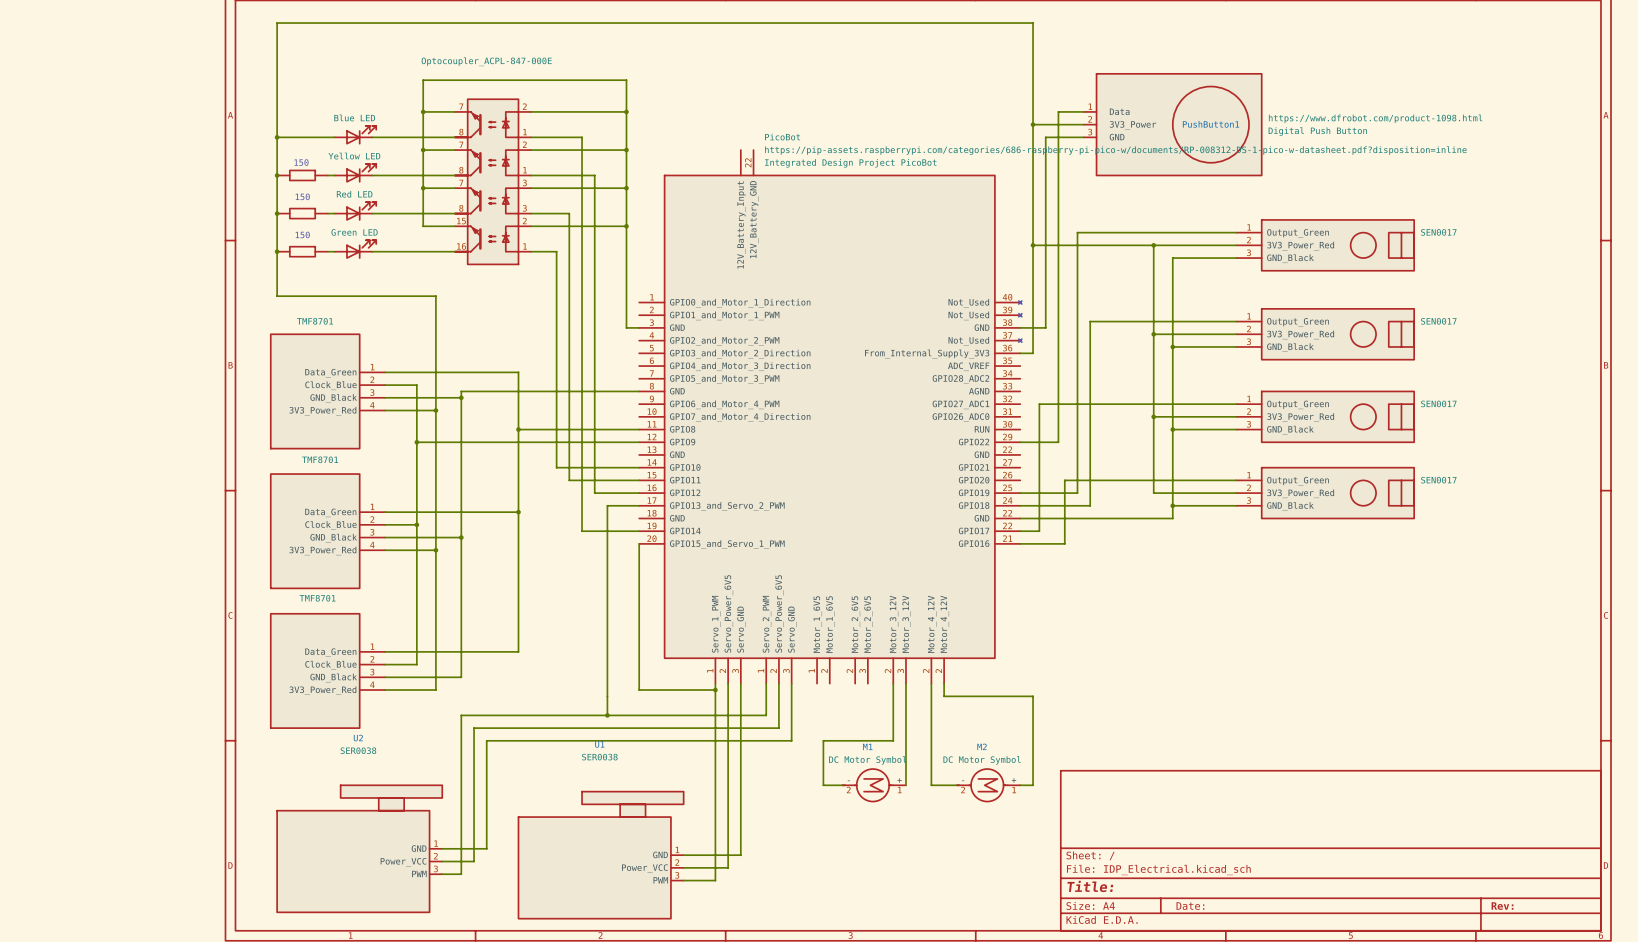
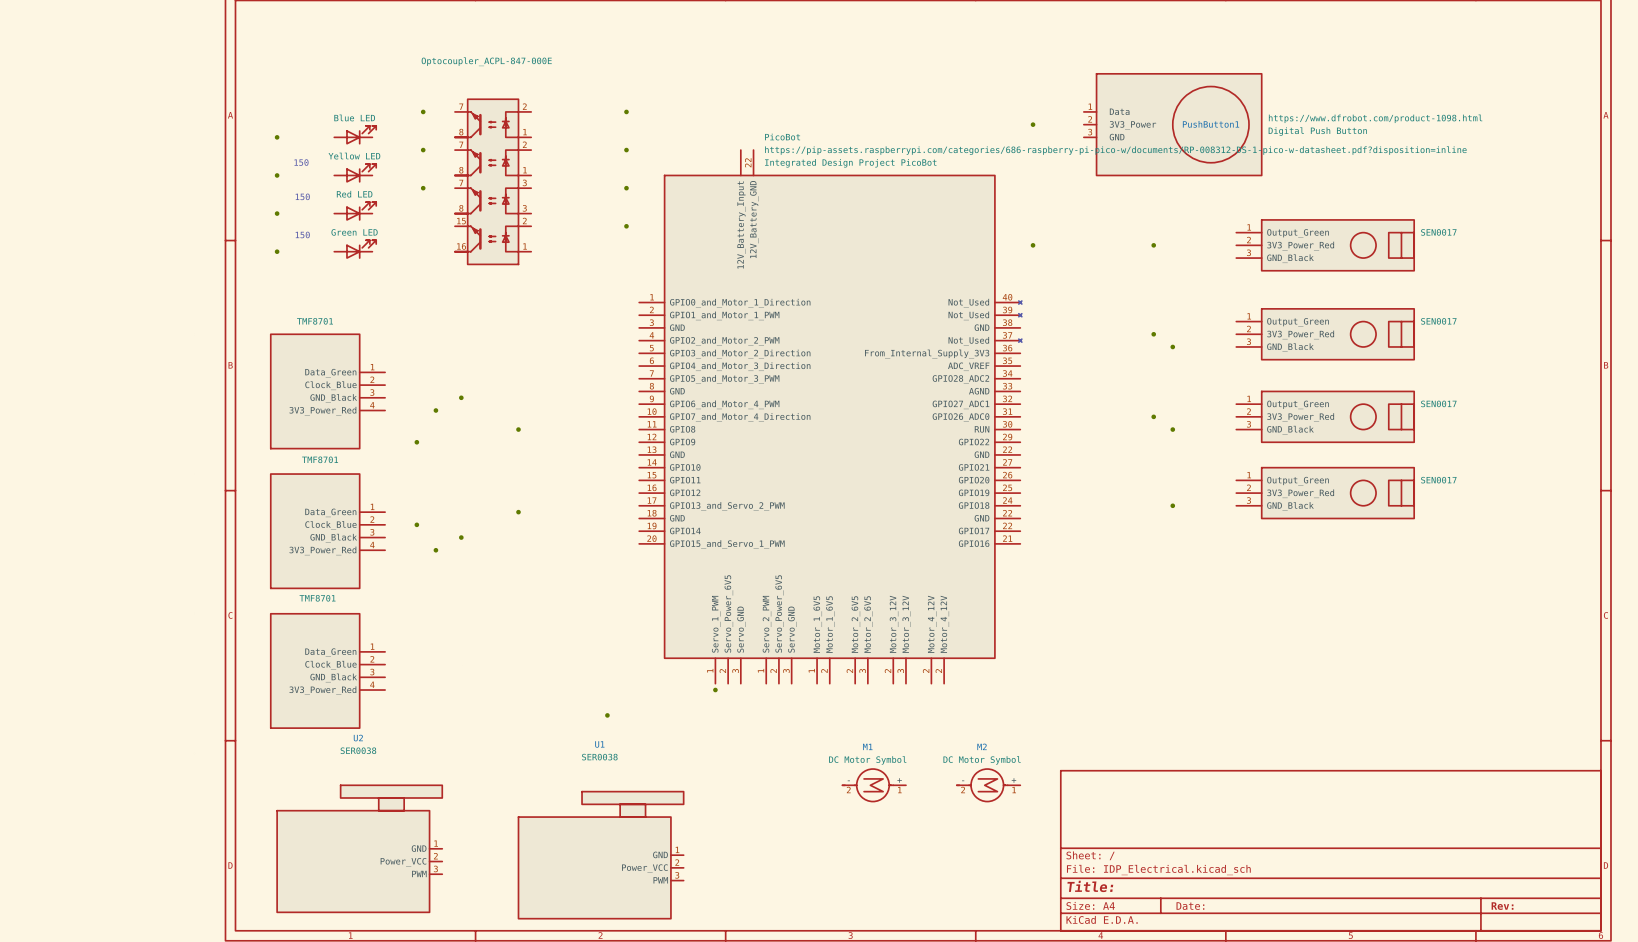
wire: (423, 111) (454, 111) -> none
wire: (531, 111) (626, 111) -> none
wire: (1083, 111) (1058, 111) (1058, 442) (1020, 442) -> none
wire: (1033, 124) (1083, 124) -> none
wire: (277, 137) (334, 137) -> none
wire: (372, 137) (454, 137) -> none
wire: (531, 137) (582, 137) (582, 531) (639, 531) -> none
wire: (1083, 137) (1045, 137) (1045, 327) (1020, 327) -> none
wire: (423, 150) (454, 150) -> none
wire: (531, 150) (626, 150) -> none
part: (302, 175) -> none
wire: (327, 175) (334, 175) -> none
wire: (372, 175) (454, 175) -> none
wire: (531, 175) (594, 175) (594, 493) (639, 493) -> none
wire: (423, 188) (454, 188) -> none
wire: (531, 188) (626, 188) -> none
part: (302, 213) -> none
wire: (327, 213) (334, 213) -> none
wire: (372, 213) (454, 213) -> none
wire: (531, 213) (569, 213) (569, 480) (639, 480) -> none
wire: (454, 226) (423, 226) (423, 80) (626, 80) (626, 327) (639, 327) -> none
wire: (531, 226) (626, 226) -> none
wire: (1236, 232) (1077, 232) (1077, 493) (1020, 493) -> none
wire: (1033, 245) (1236, 245) -> none
wire: (1153, 245) (1153, 493) (1236, 493) -> none
part: (302, 251) -> none
wire: (327, 251) (334, 251) -> none
wire: (372, 251) (454, 251) -> none
wire: (531, 251) (556, 251) (556, 467) (639, 467) -> none
wire: (1236, 258) (1172, 258) (1172, 518) (1020, 518) -> none
wire: (1236, 321) (1090, 321) (1090, 505) (1020, 505) -> none
wire: (1153, 334) (1236, 334) -> none
wire: (1172, 346) (1236, 346) -> none
wire: (1020, 353) (1033, 353) (1033, 23) (277, 23) (277, 296) (435, 296) (435, 690) (385, 690) -> none
wire: (385, 372) (518, 372) (518, 651) (385, 651) -> none
wire: (385, 385) (416, 385) (416, 664) (385, 664) -> none
wire: (639, 391) (461, 391) (461, 677) (385, 677) -> none
wire: (385, 397) (461, 397) -> none
wire: (1236, 404) (1039, 404) (1039, 531) (1020, 531) -> none
wire: (385, 410) (435, 410) -> none
wire: (1153, 416) (1236, 416) -> none
wire: (518, 429) (639, 429) -> none
wire: (1172, 429) (1236, 429) -> none
wire: (416, 442) (639, 442) -> none
wire: (1236, 480) (1064, 480) (1064, 543) (1020, 543) -> none
wire: (639, 505) (607, 505) (607, 715) -> none
wire: (1172, 505) (1236, 505) -> none
wire: (385, 512) (518, 512) -> none
wire: (385, 524) (416, 524) -> none
wire: (385, 537) (461, 537) -> none
wire: (639, 543) (639, 690) (715, 690) -> none
wire: (385, 550) (435, 550) -> none
wire: (715, 683) (715, 880) (683, 880) -> none
wire: (728, 683) (728, 867) (683, 867) -> none
wire: (740, 683) (740, 855) (683, 855) -> none
wire: (766, 683) (766, 715) (461, 715) (461, 874) (442, 874) -> none
wire: (778, 683) (778, 728) (474, 728) (474, 861) (442, 861) -> none
wire: (791, 683) (791, 740) (486, 740) (486, 848) (442, 848) -> none
wire: (893, 683) (893, 740) (823, 740) (823, 785) (842, 785) -> none
wire: (905, 683) (905, 785) -> none
wire: (931, 683) (931, 785) (956, 785) -> none
wire: (944, 683) (944, 696) (1033, 696) (1033, 785) (1020, 785) -> none

